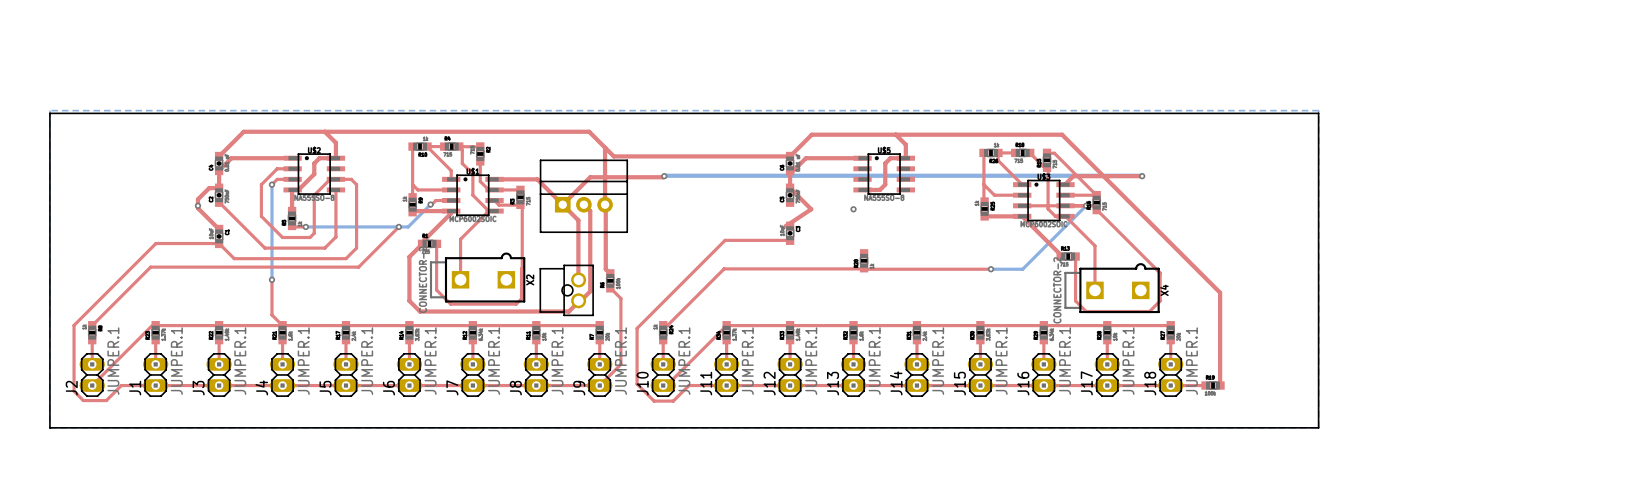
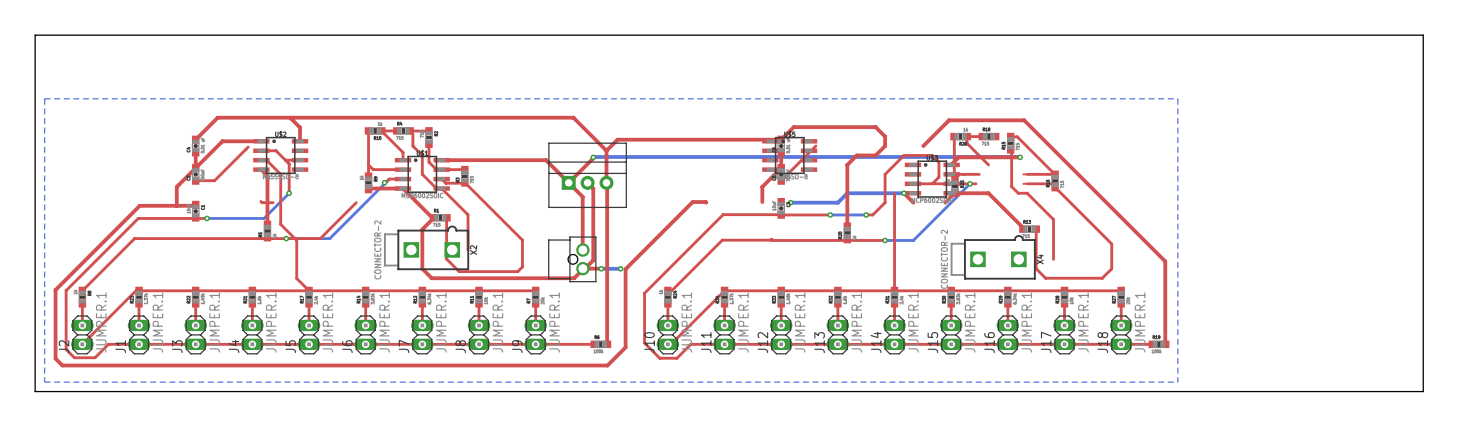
board edge: (49, 113) (1318, 113) (1318, 427) (49, 427) (49, 113) -> (35, 35) (35, 391) (1423, 391) (1423, 35) (35, 35)
top track: (589, 131) (613, 156) (691, 156) -> (526, 117) (573, 117) (606, 150)
top track: (895, 134) (905, 144) (905, 158) (890, 158) (885, 163) (885, 184) (879, 189) (862, 189) -> none
top track: (605, 147) (605, 269) (610, 273) -> none
top track: (983, 152) (984, 201) -> (954, 136) (954, 180)
part position: (990, 152) -> (960, 136)
top track: (1015, 152) (998, 152) (998, 160) (1022, 184) -> (982, 136) (966, 136) (966, 143) (988, 164)
part position: (1022, 152) -> (988, 136)
top track: (1029, 152) (1044, 167) (1048, 169) (1048, 208) (1055, 216) (1065, 216) (1094, 245) (1094, 290) -> none
top track: none -> (1010, 136) (1017, 136) (1055, 174)
top track: (1047, 153) (1054, 153) (1096, 195) -> none
top track: none -> (617, 139) (606, 150)
top track: (790, 156) (811, 134) (1062, 134) (1220, 292) (1220, 385) -> (705, 139) (781, 139) (793, 127) (875, 127) (885, 136) (885, 146) (875, 155) (856, 155) (847, 164) (847, 226)
top track: (249, 158) (231, 158) (219, 170) -> (222, 141) (176, 186) (176, 205)
top track: (335, 158) (319, 158) (314, 163) (314, 174) (298, 189) (292, 190) (292, 210) -> none
top track: (862, 158) (805, 158) (790, 174) -> none
part position: (1047, 160) -> (1010, 143)
part position: (790, 163) -> (781, 146)
top track: none -> (815, 146) (781, 180)
top track: none -> (923, 146) (949, 120) (1024, 120) (1165, 261) (1165, 344)
top track: (287, 168) (277, 168) (261, 184) (261, 216) (282, 237) (310, 237) (314, 233) -> (309, 290) (296, 278) (296, 240) (280, 224) (280, 208)
top track: none -> (261, 150) (275, 150) (289, 163) (289, 193)
top track: none -> (606, 150) (607, 344)
top track: none -> (1012, 151) (1011, 186) (1018, 193) (1027, 193) (1053, 219) (1053, 259)
top track: (790, 170) (790, 188) (811, 209) (785, 226) -> (195, 205) (139, 205) (55, 290) (55, 358) (62, 365) (607, 365) (625, 347) (625, 269) (692, 202) (701, 202)
top track: none -> (781, 152) (781, 168) (762, 186) (762, 202)
top track: (664, 176) (590, 177) (562, 204) -> (593, 157) (568, 182)
top track: (292, 179) (277, 179) (271, 184) -> none
top track: none -> (261, 160) (266, 160) (280, 174)
top track: (330, 179) (314, 195) -> (294, 160) (285, 160)
top track: (335, 179) (351, 179) (356, 184) (356, 248) (345, 258) (234, 258) (219, 243) (154, 244) -> (207, 218) (138, 218)
top track: (537, 179) (578, 220) (578, 279) -> (479, 160) (546, 160) (582, 196) (582, 250)
bottom track: (271, 184) (271, 279) -> none
via: (271, 184) -> none
top track: (983, 184) (994, 195) (1022, 195) -> none
top track: (219, 188) (209, 188) (197, 199) (197, 208) (219, 231) -> none
top track: none -> (261, 169) (267, 175) (267, 224)
top track: (335, 189) (335, 237) (324, 248) (264, 248) (219, 202) -> (248, 146) (214, 180) (195, 180)
part position: (790, 195) -> (781, 174)
top track: none -> (1023, 174) (1054, 174)
part position: (583, 196) -> (587, 175)
bottom track: none -> (389, 179) (329, 238) (286, 238)
part position: (1096, 202) -> (1055, 180)
bottom track: (430, 204) (408, 226) (305, 226) -> none
top track: (583, 204) (590, 211) (590, 291) (568, 311) -> (601, 268) (582, 268) (574, 278) (508, 278)
top track: none -> (587, 182) (593, 188) (593, 260) (584, 268)
via: (197, 205) -> none
top track: none -> (932, 183) (938, 177) (938, 162) (932, 155) (903, 155) (885, 174) (885, 202) (872, 214) (866, 214)
top track: (1092, 205) (1160, 273) -> (1035, 229) (1036, 243)
top track: (522, 206) (521, 298) (516, 304) -> (466, 184) (522, 240) (522, 266) (517, 271) (461, 271)
part position: (984, 208) -> (954, 186)
via position: (853, 209) -> (790, 202)
top track: (451, 211) (409, 256) (409, 300) (420, 311) (483, 311) -> (403, 188) (433, 217) (422, 229) (422, 268) (431, 278)
top track: (488, 211) (460, 239) (460, 279) -> none
top track: none -> (441, 188) (468, 214) (468, 249)
bottom track: none -> (289, 193) (263, 218) (207, 218)
top track: (984, 216) (1022, 216) (1061, 256) -> none
top track: none -> (894, 193) (894, 290)
top track: none -> (903, 193) (913, 202)
bottom track: none -> (903, 193) (847, 193) (837, 202) (790, 202)
via: none -> (903, 193)
part position: (292, 218) -> (267, 231)
via position: (305, 226) -> (289, 193)
via: (398, 226) -> none
top track: none -> (945, 202) (954, 192) (988, 193) (1023, 229)
part position: (790, 233) -> (781, 208)
top track: (790, 240) (725, 240) (637, 328) (637, 384) (654, 401) (673, 401) (688, 385) (747, 385) -> none
top track: none -> (830, 214) (723, 214) (644, 293) (644, 343) (659, 358) (676, 358) (690, 344)
bottom track: none -> (830, 214) (866, 214)
via: none -> (830, 214)
via: none -> (866, 214)
part position: (429, 243) -> (440, 217)
top track: (436, 243) (436, 290) (450, 304) (514, 304) -> (446, 217) (446, 259) (459, 271)
via: none -> (207, 218)
part position: (1068, 256) -> (1029, 229)
top track: (1075, 256) (1075, 300) (1086, 311) (1149, 311) (1160, 300) -> (1023, 183) (1051, 183) (1111, 243) (1111, 268) (1102, 278) (1045, 278) (1036, 268)
part position: (864, 260) -> (847, 232)
via: none -> (286, 238)
top track: (808, 268) (724, 268) (667, 325) (663, 325) -> none
top track: (271, 279) (271, 315) (282, 325) -> none
via: (271, 279) -> none
part rotation: 0° (610, 280) -> 90° clockwise (600, 344)
part position: (610, 280) -> (600, 344)
top track: (610, 287) (620, 298) (620, 364) (599, 385) -> (592, 344) (535, 344)
part position: (566, 290) -> (572, 259)
bottom track: none -> (601, 268) (620, 268)
via: none -> (601, 268)
via: none -> (620, 268)
top track: (747, 325) (726, 325) (665, 385) -> none
top track: (752, 325) (811, 325) -> (671, 290) (722, 240)
top track: none -> (1045, 290) (1121, 290)
part position: (663, 332) -> (667, 297)
part position: (726, 332) -> (724, 297)
part position: (790, 332) -> (781, 297)
part position: (853, 332) -> (837, 297)
part position: (916, 332) -> (894, 297)
part position: (980, 332) -> (951, 297)
part position: (1043, 332) -> (1007, 297)
part position: (1107, 332) -> (1064, 297)
part position: (1170, 332) -> (1121, 297)
top track: (663, 339) (663, 364) -> (667, 303) (667, 325)
top track: (726, 339) (726, 364) -> (724, 303) (724, 325)
top track: (790, 339) (790, 364) -> (781, 303) (781, 325)
top track: (853, 339) (853, 364) -> (837, 303) (837, 325)
top track: (916, 339) (916, 364) -> (894, 303) (894, 325)
top track: (980, 339) (980, 364) -> (951, 303) (951, 325)
top track: (1043, 339) (1043, 364) -> (1007, 303) (1007, 325)
top track: (1107, 339) (1107, 364) -> (1064, 303) (1064, 325)
top track: (1170, 339) (1170, 364) -> (1121, 303) (1121, 325)
J10 position: (663, 374) -> (667, 334)
J11 position: (726, 374) -> (724, 334)
J12 position: (790, 374) -> (781, 334)
J13 position: (853, 374) -> (837, 334)
J14 position: (916, 374) -> (894, 334)
J15 position: (980, 374) -> (951, 334)
J16 position: (1043, 374) -> (1007, 334)
J17 position: (1107, 374) -> (1064, 334)
J18 position: (1170, 374) -> (1121, 334)
top track: (751, 385) (773, 385) -> (671, 344) (724, 290)
top track: none -> (1077, 344) (1152, 344)
part position: (1213, 385) -> (1158, 344)

